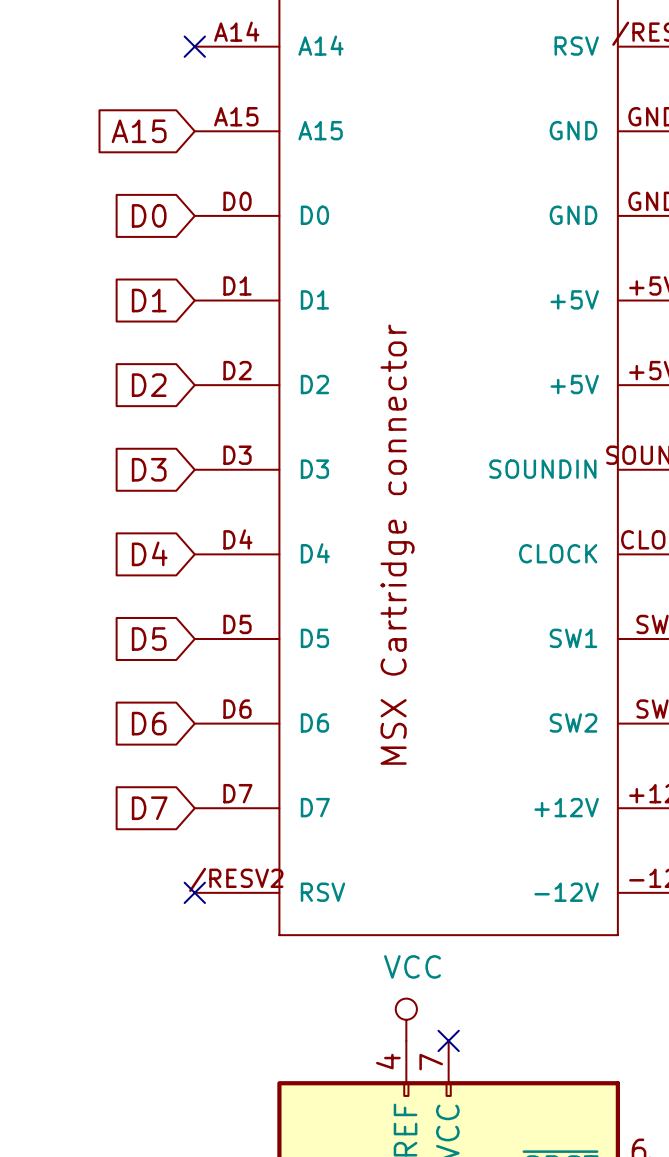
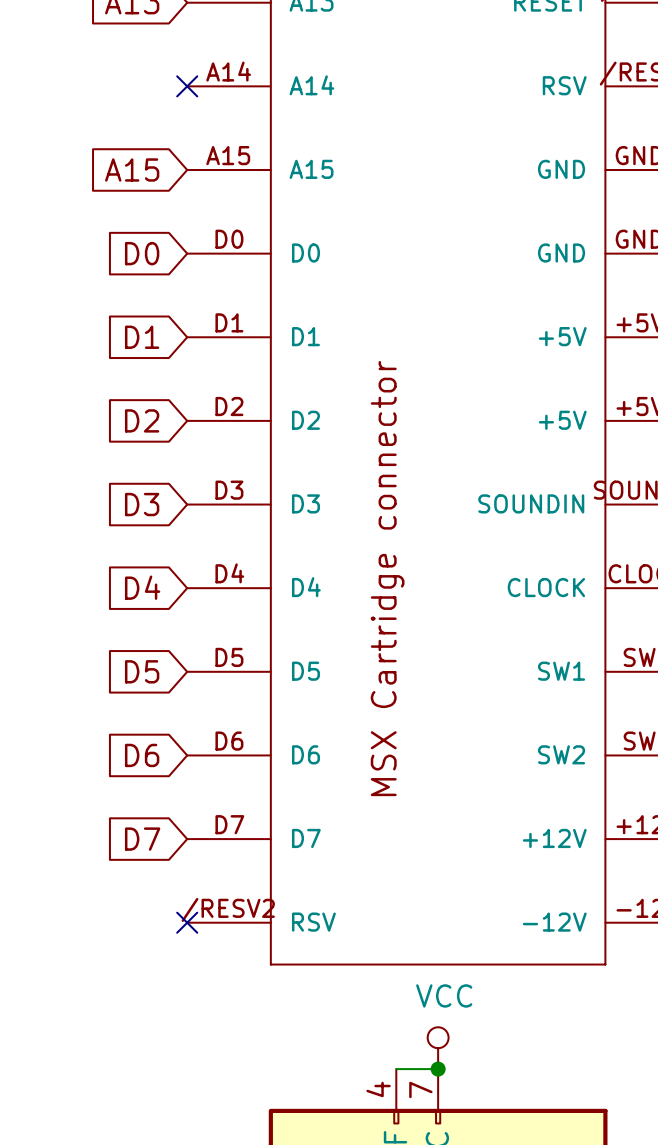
power symbol position: VCC (406, 1019) -> VCC (438, 1048)
wire: none -> (396, 1069) (438, 1069)
no-connect mark: (448, 1040) -> none
junction: none -> (438, 1069)

